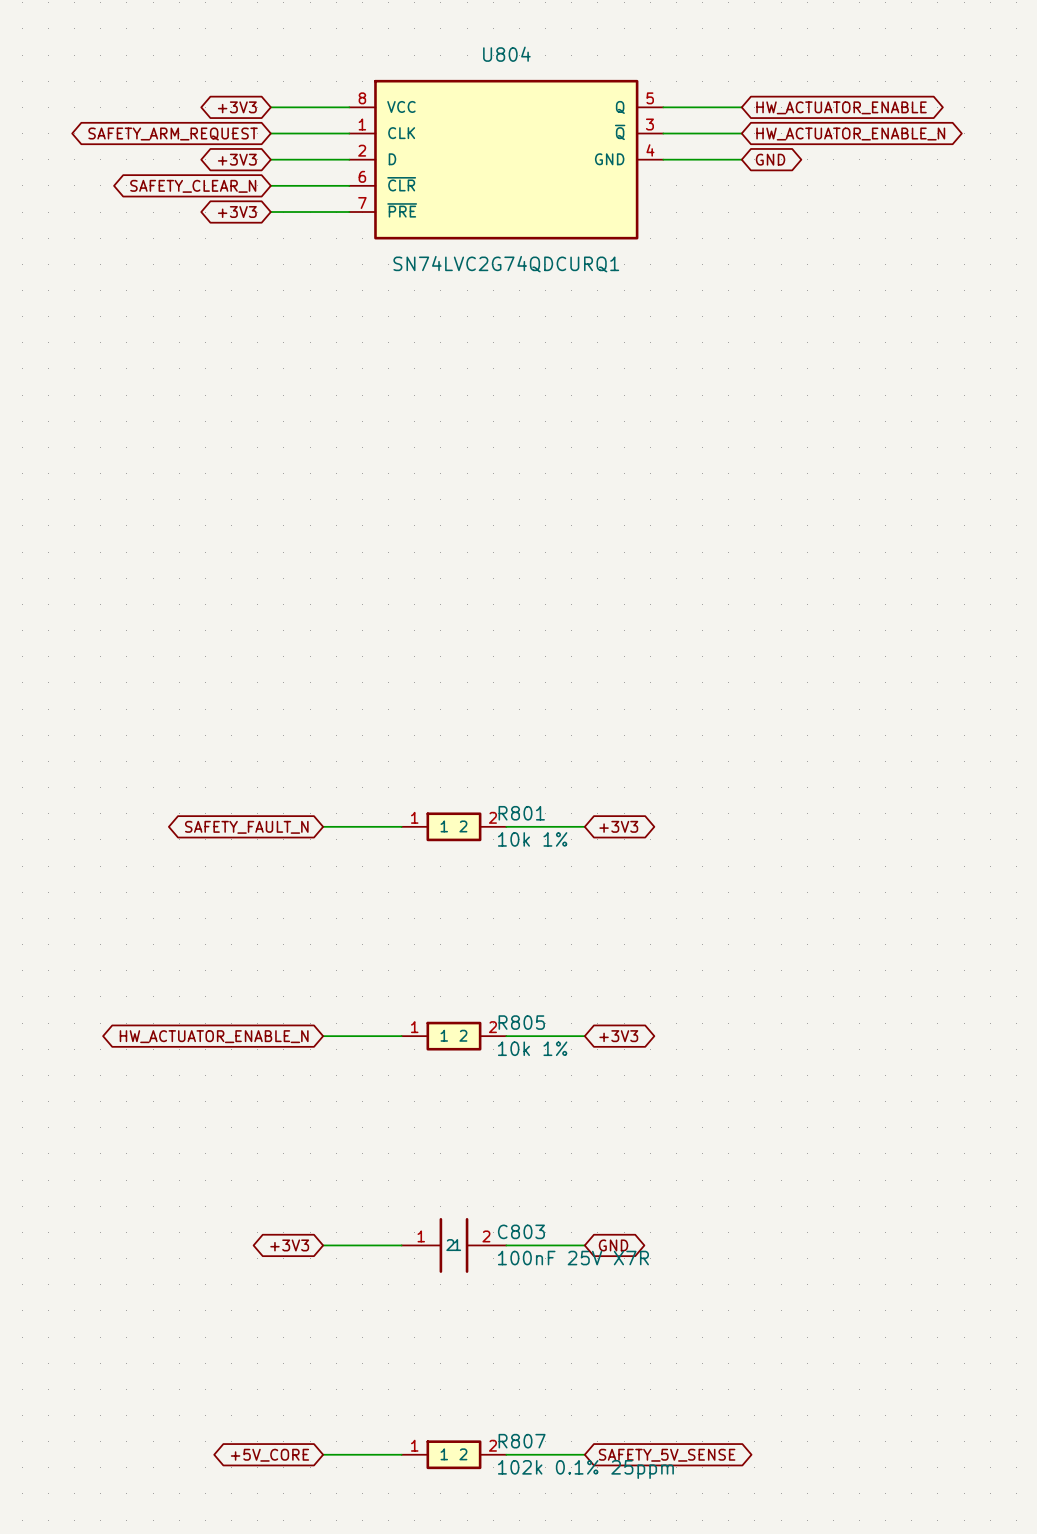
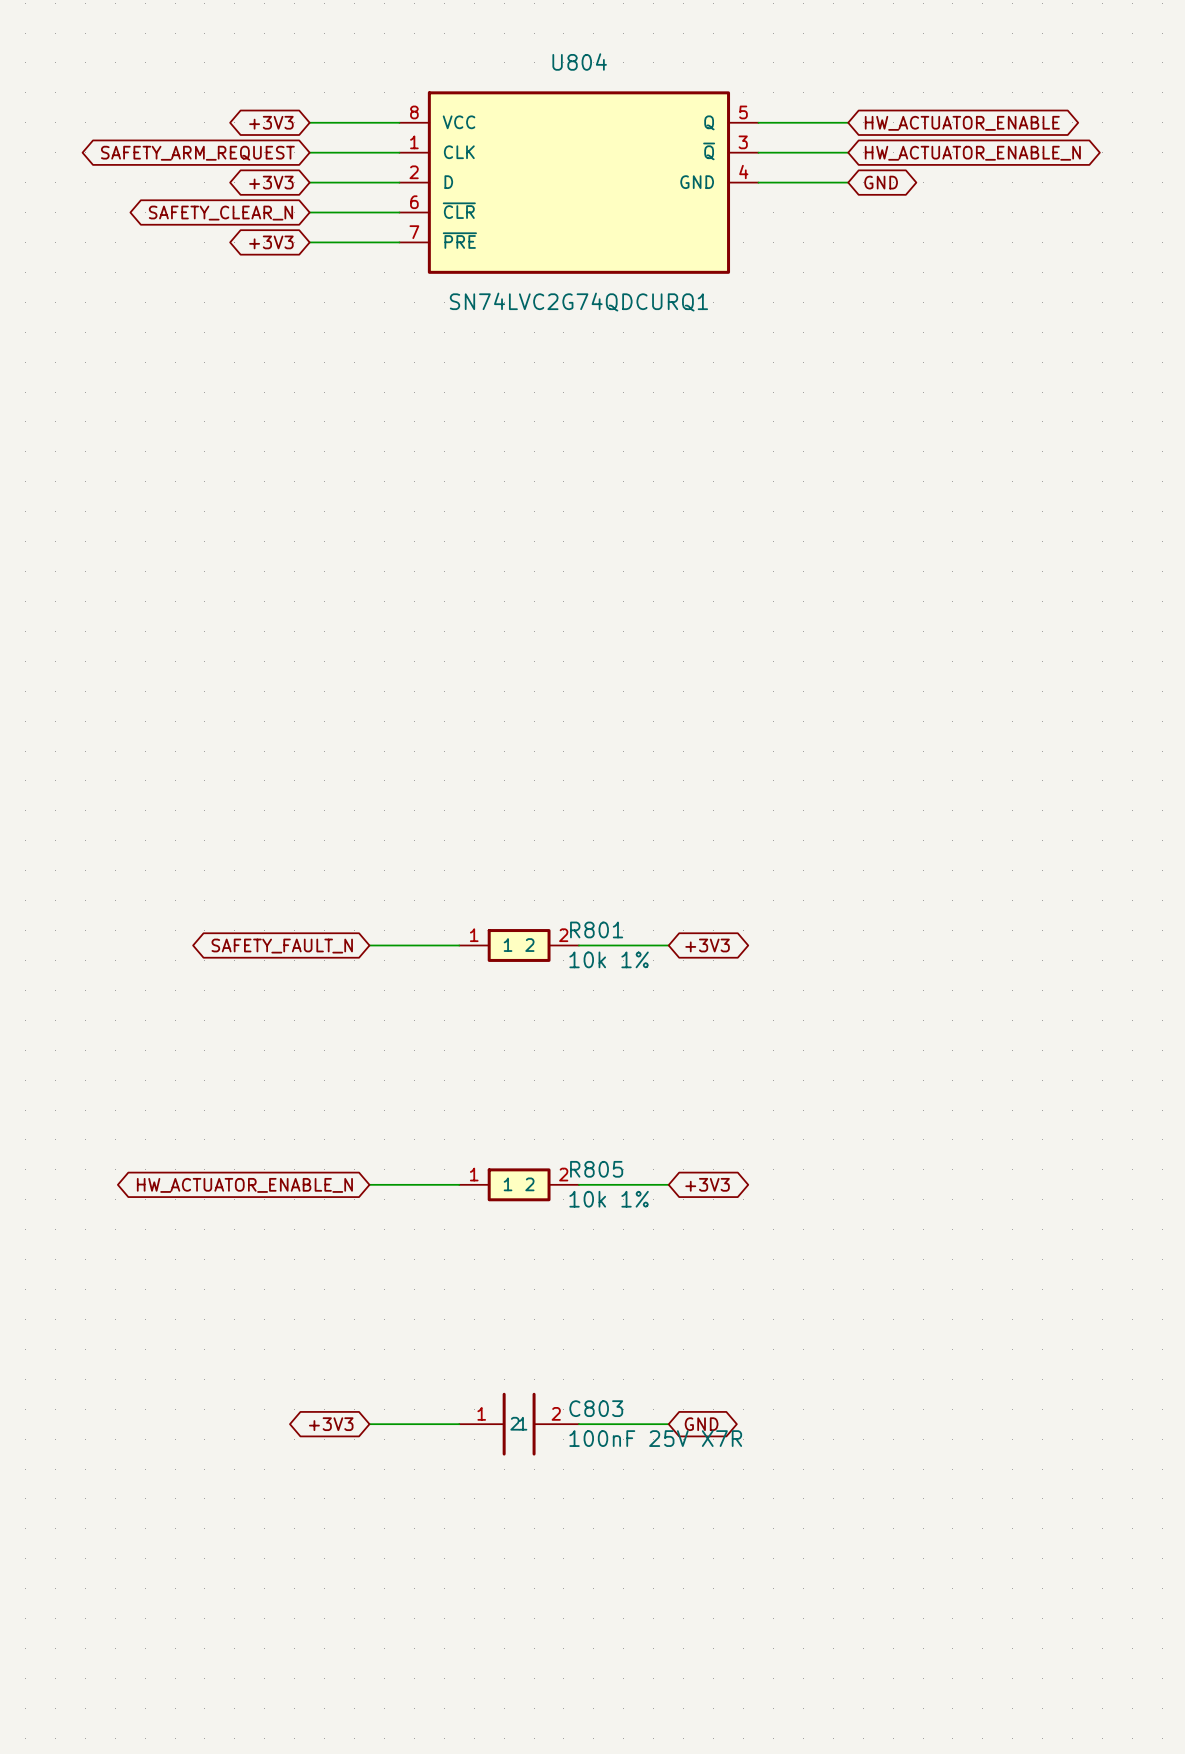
wire: (323, 1454) (401, 1454) -> none
R807: 102k 0.1% 25ppm (453, 1454) -> none
wire: (506, 1454) (584, 1454) -> none
global label: +5V_CORE (269, 1455) -> none
global label: SAFETY_5V_SENSE (667, 1455) -> none

